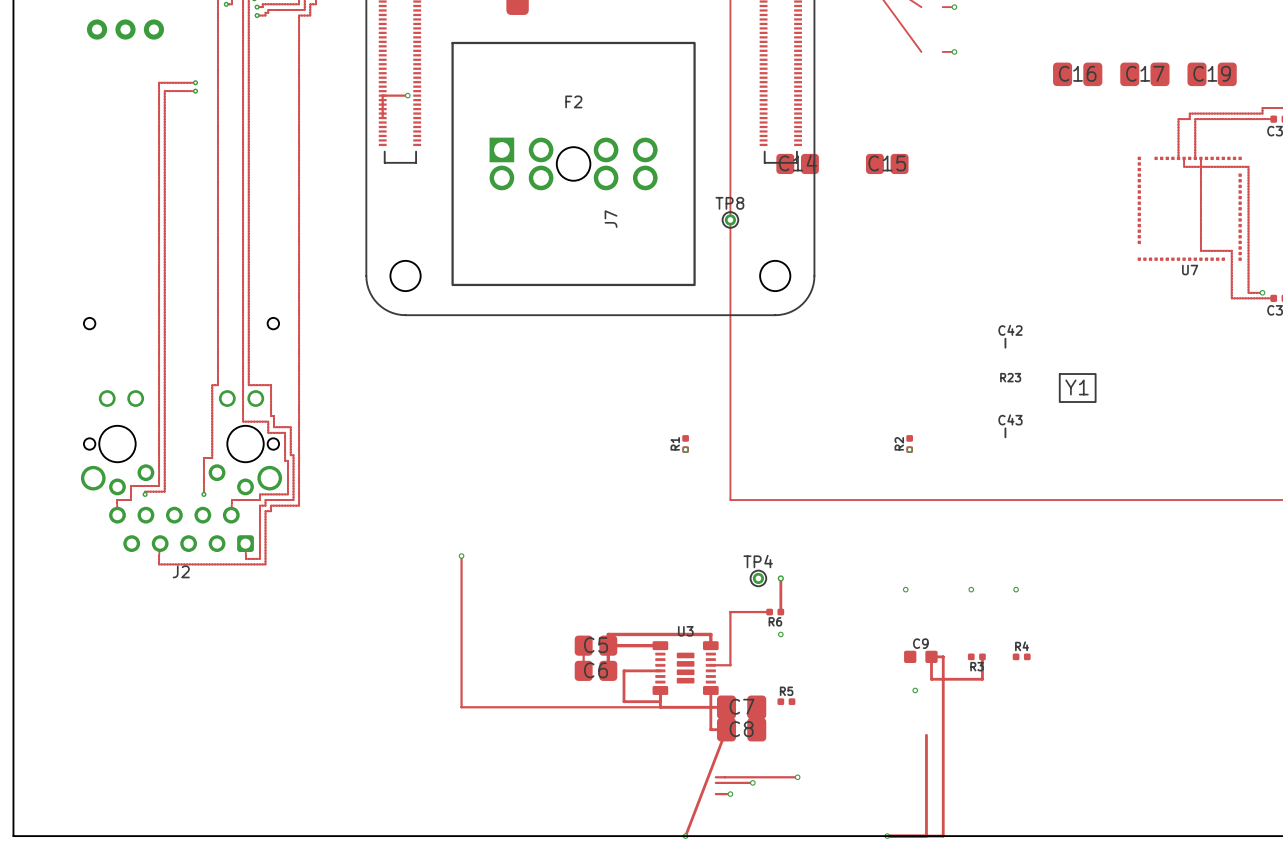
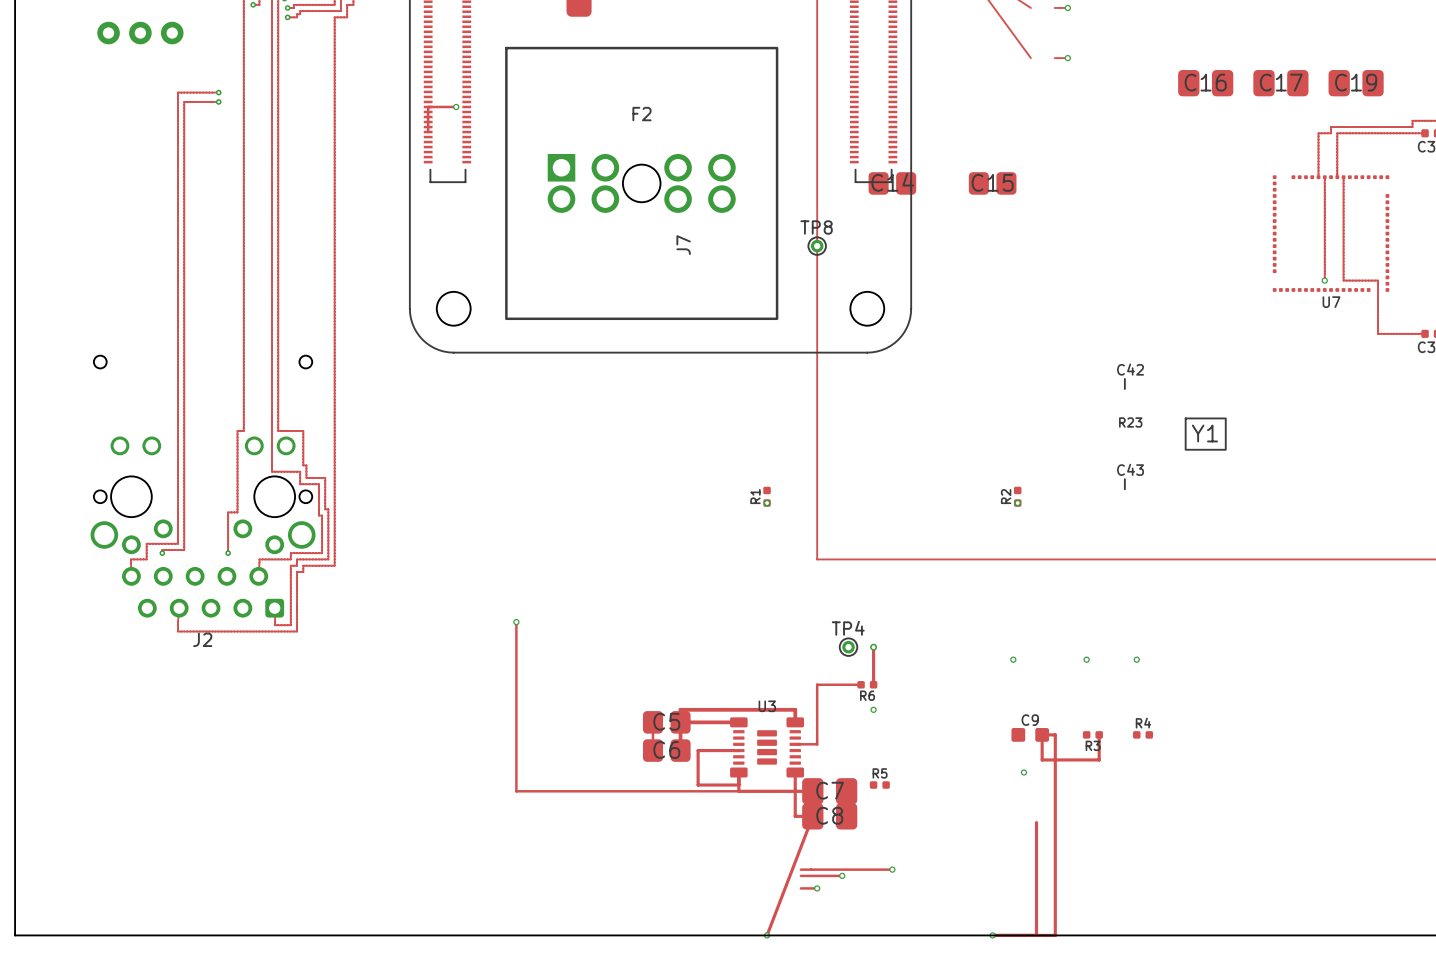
track: (1184, 166) (1248, 166) (1248, 292) (1262, 292) -> (1324, 186) (1324, 280)
via: none -> (1324, 280)
via: (1262, 292) -> none

